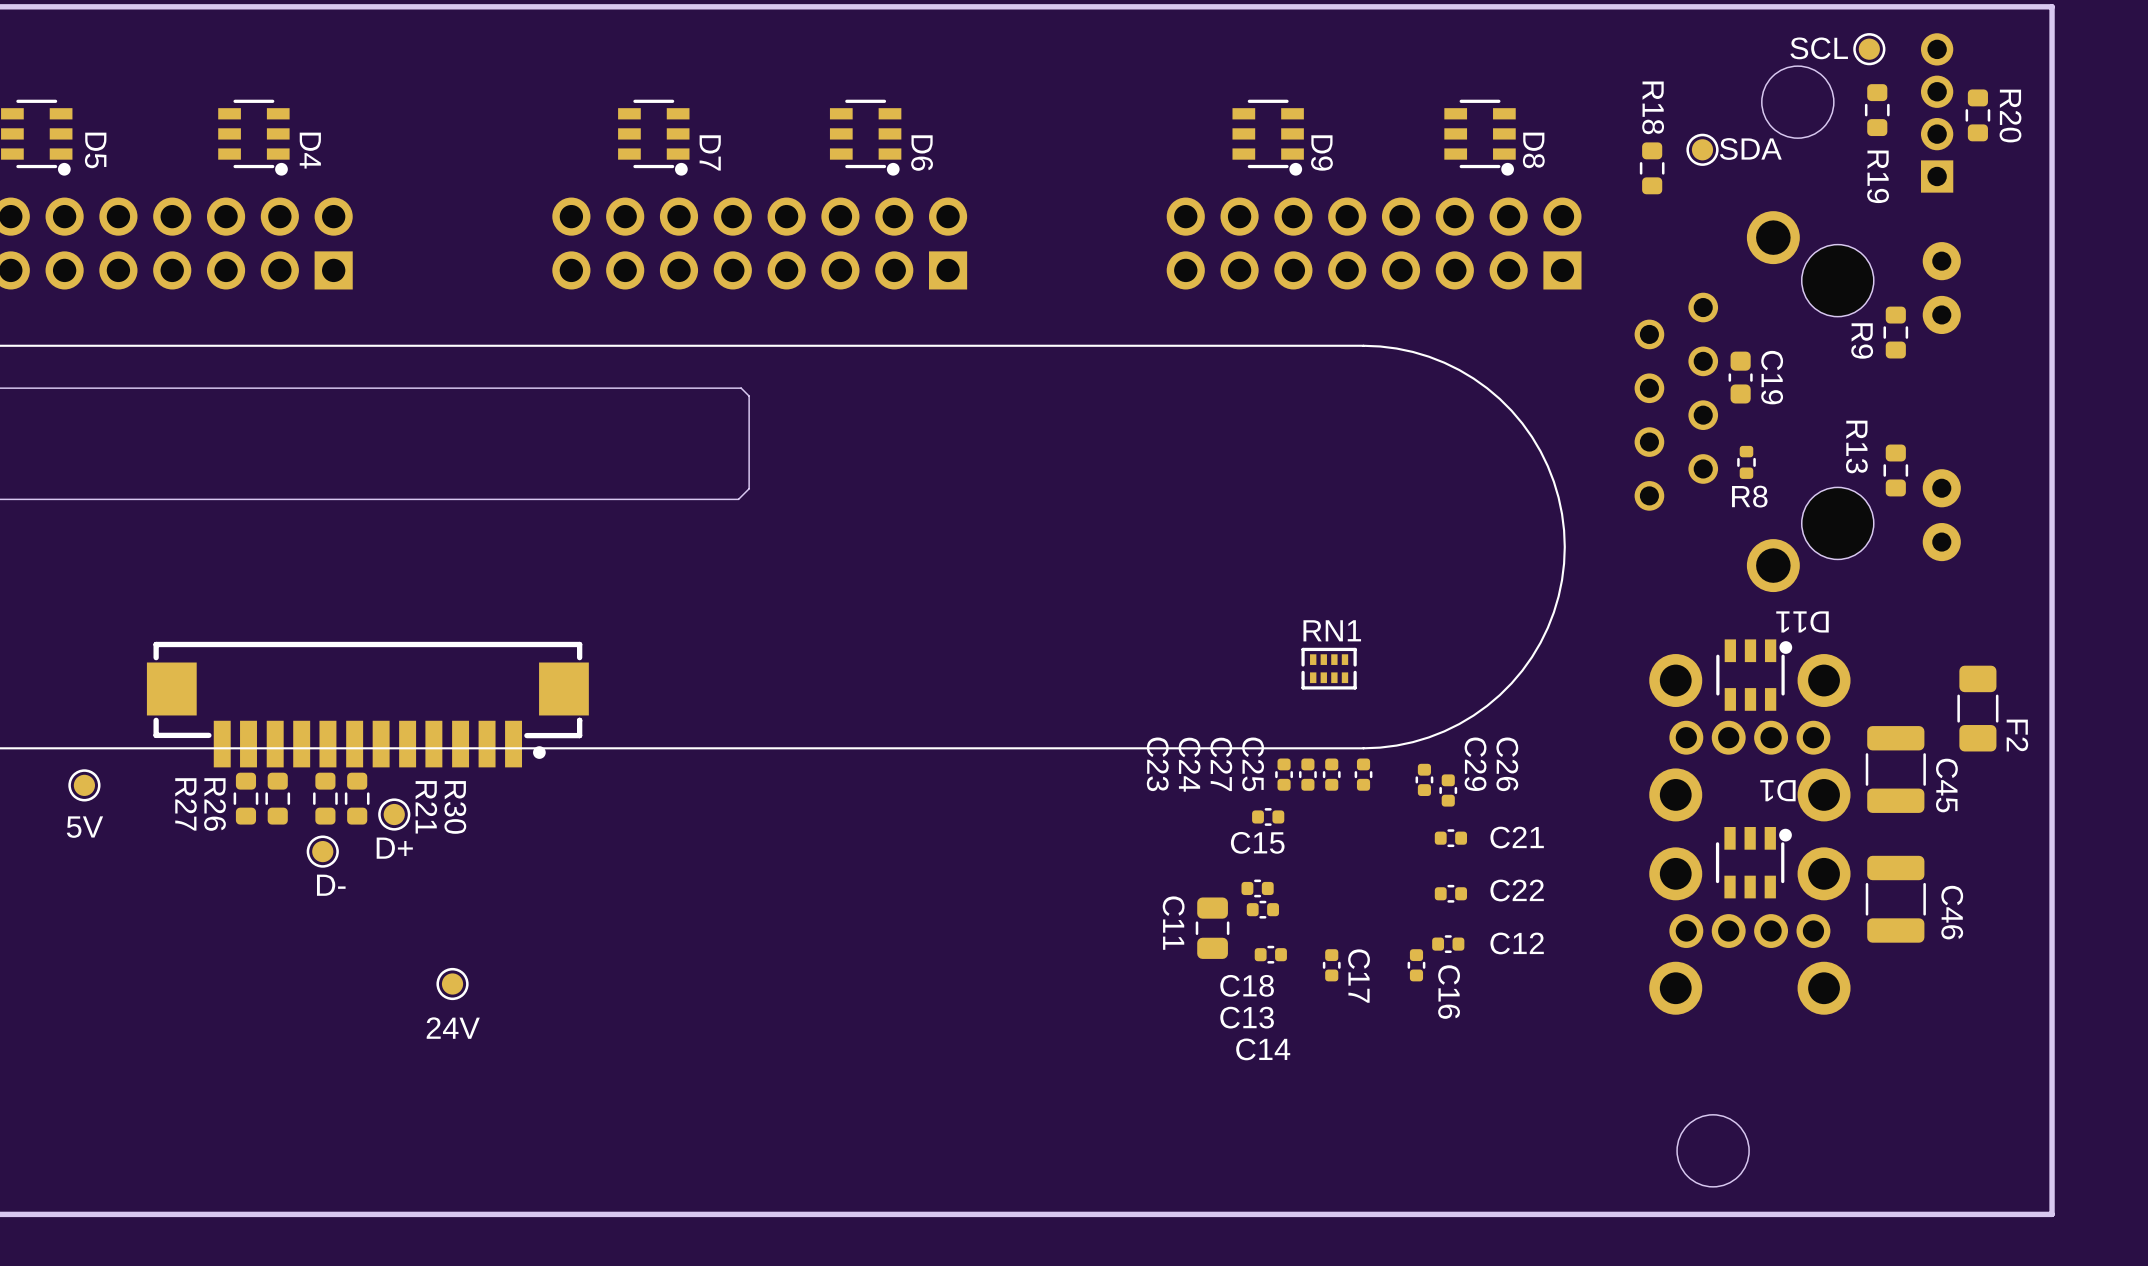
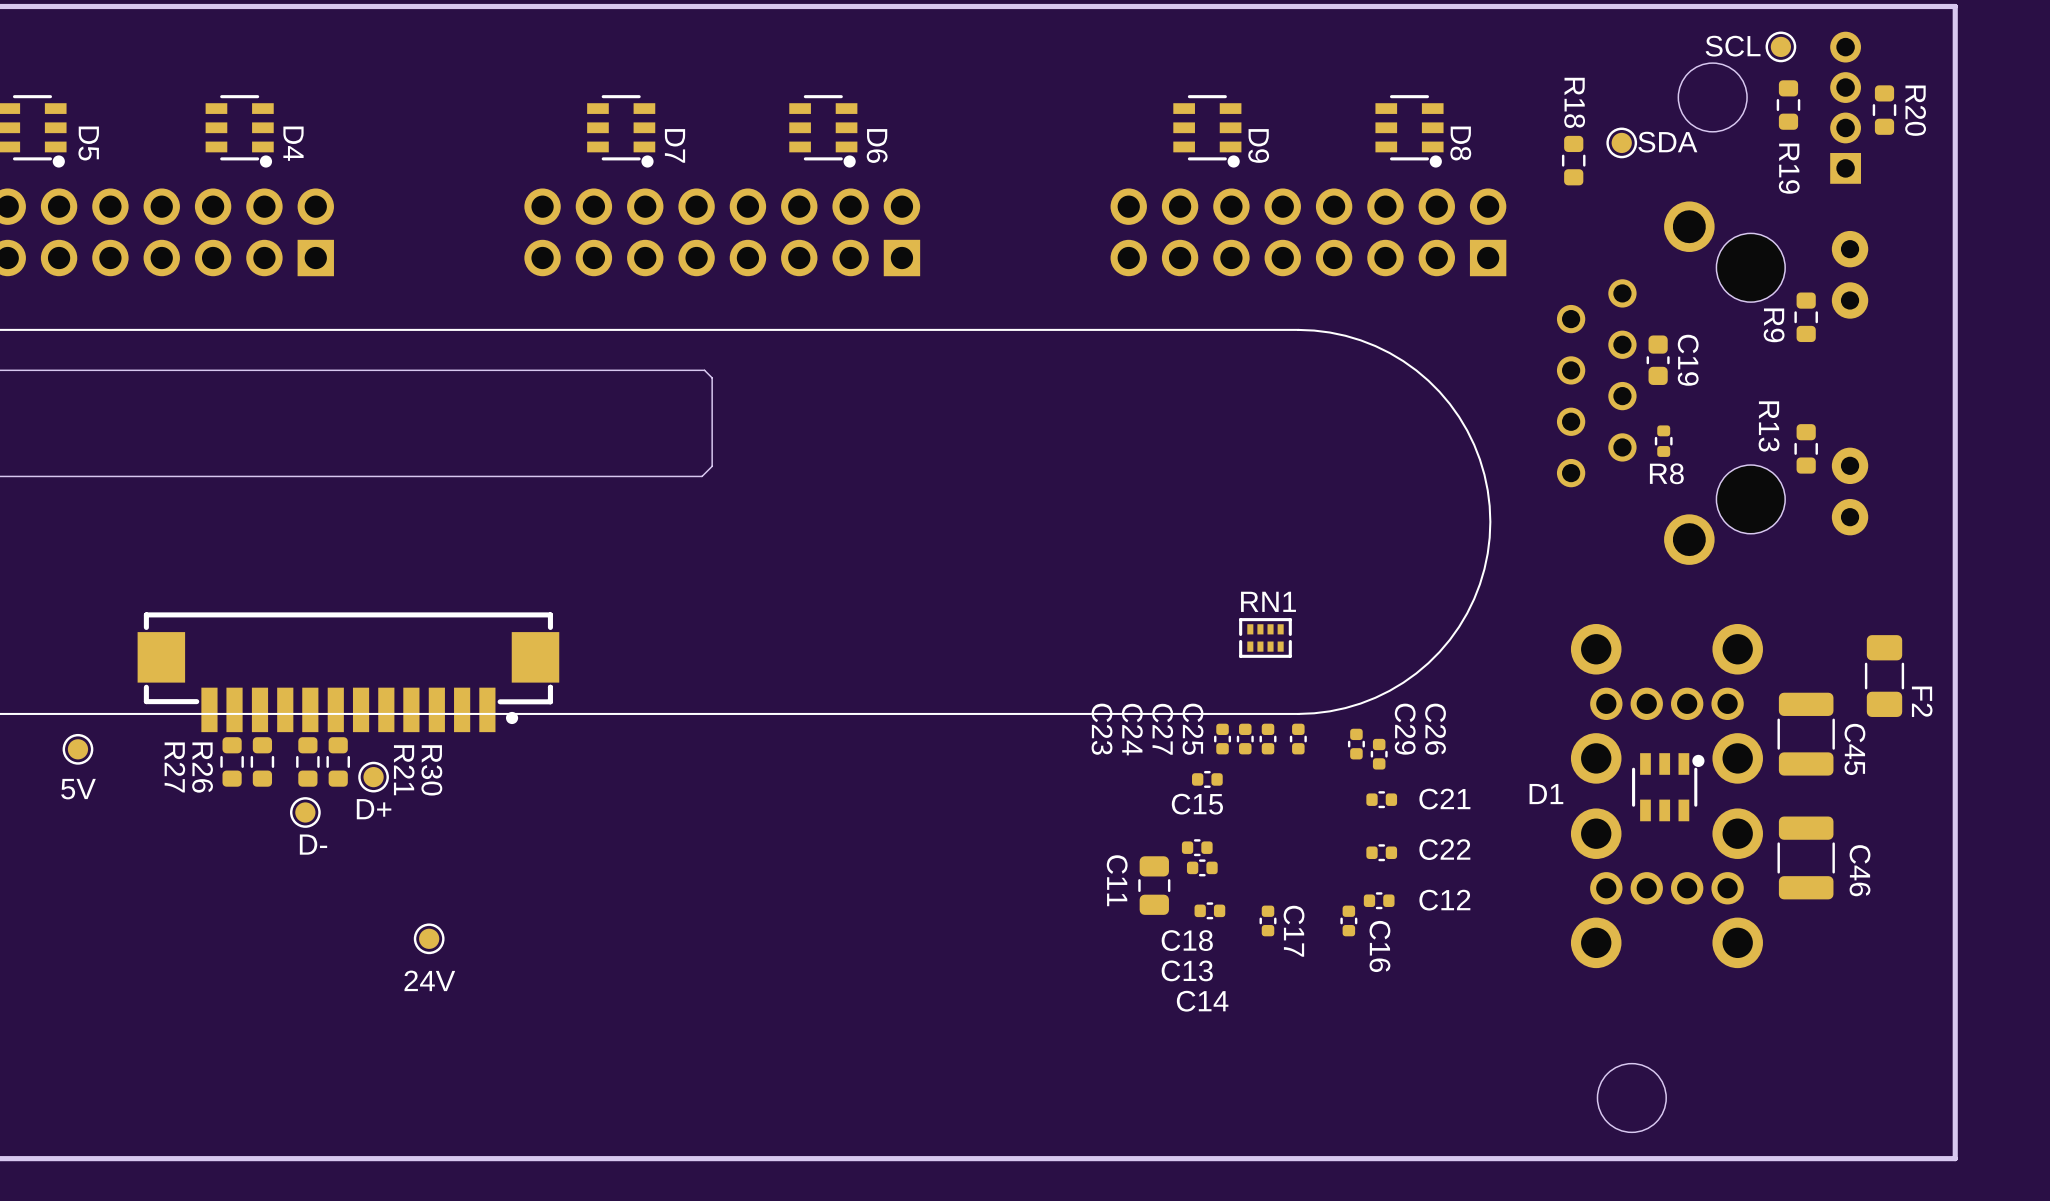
D11: (1754, 675) -> none
D1 name rotation: 0° (1777, 790) -> 180° (1546, 794)
D1 name position: D1 (1777, 790) -> D1 (1546, 794)
D1 position: (1753, 862) -> (1668, 787)

